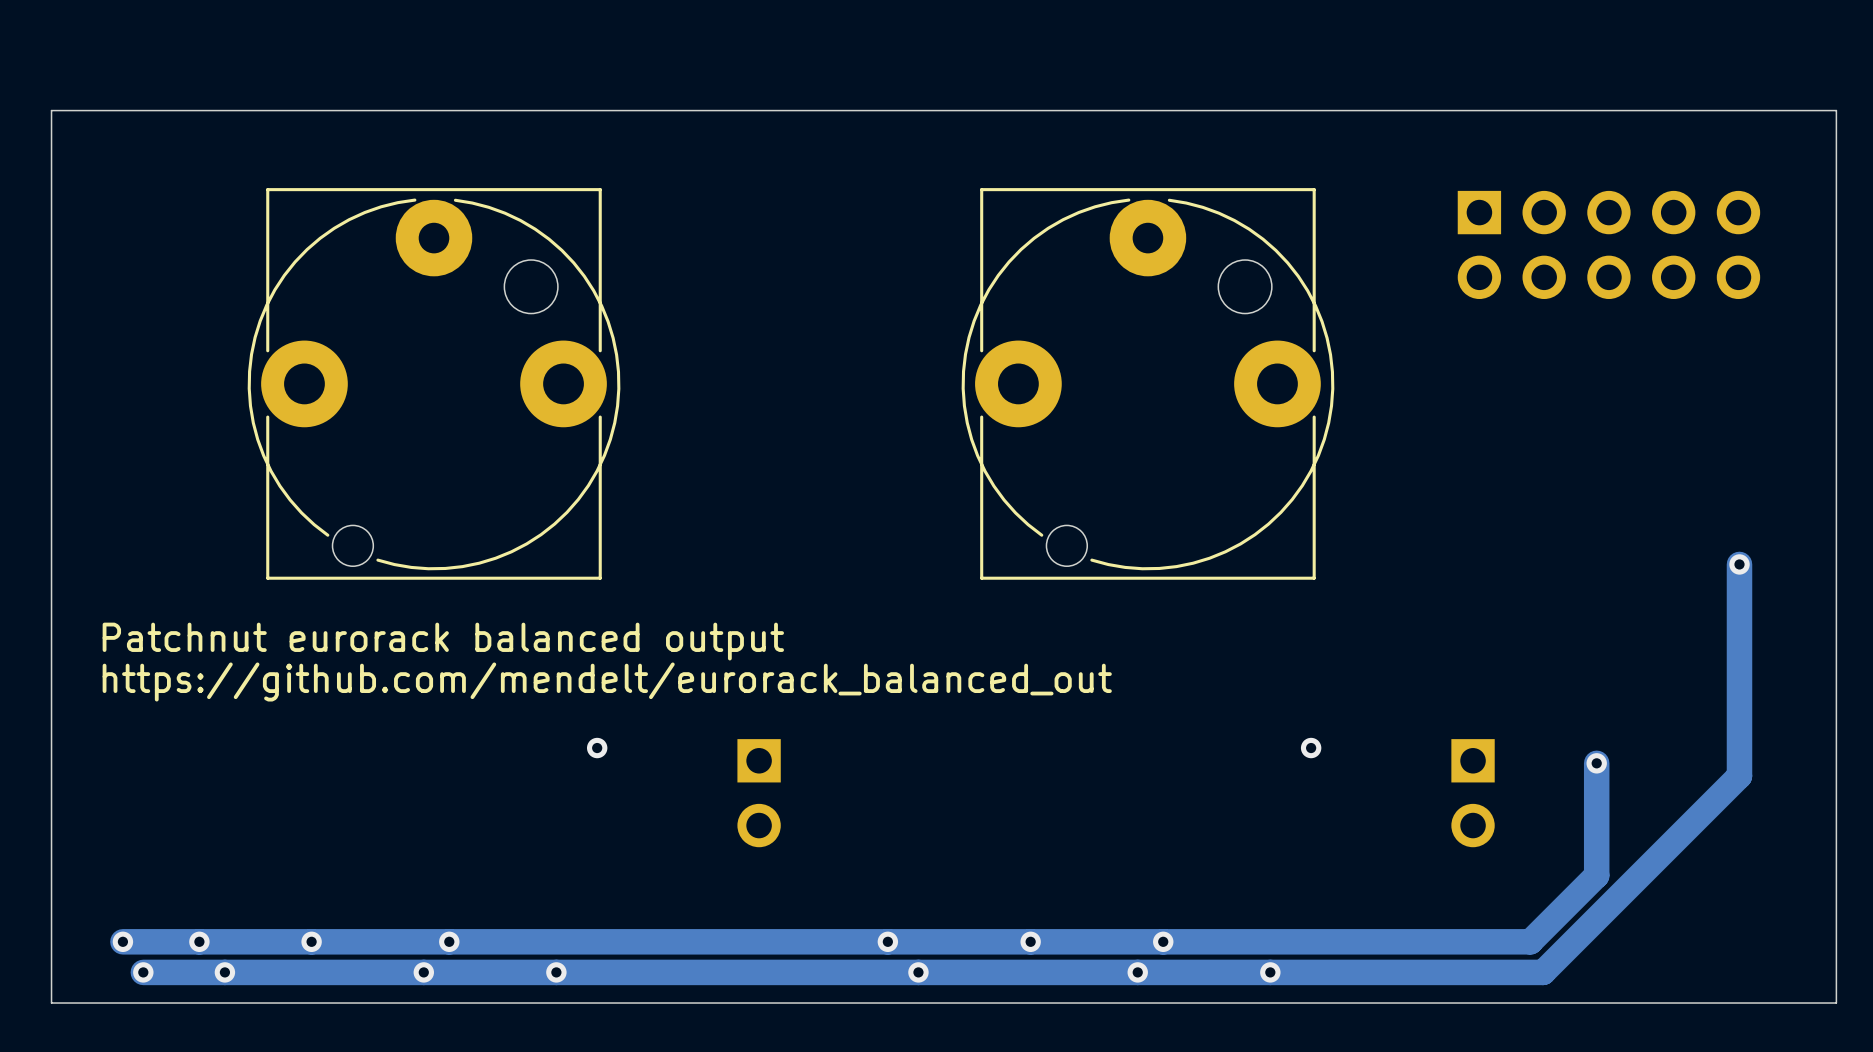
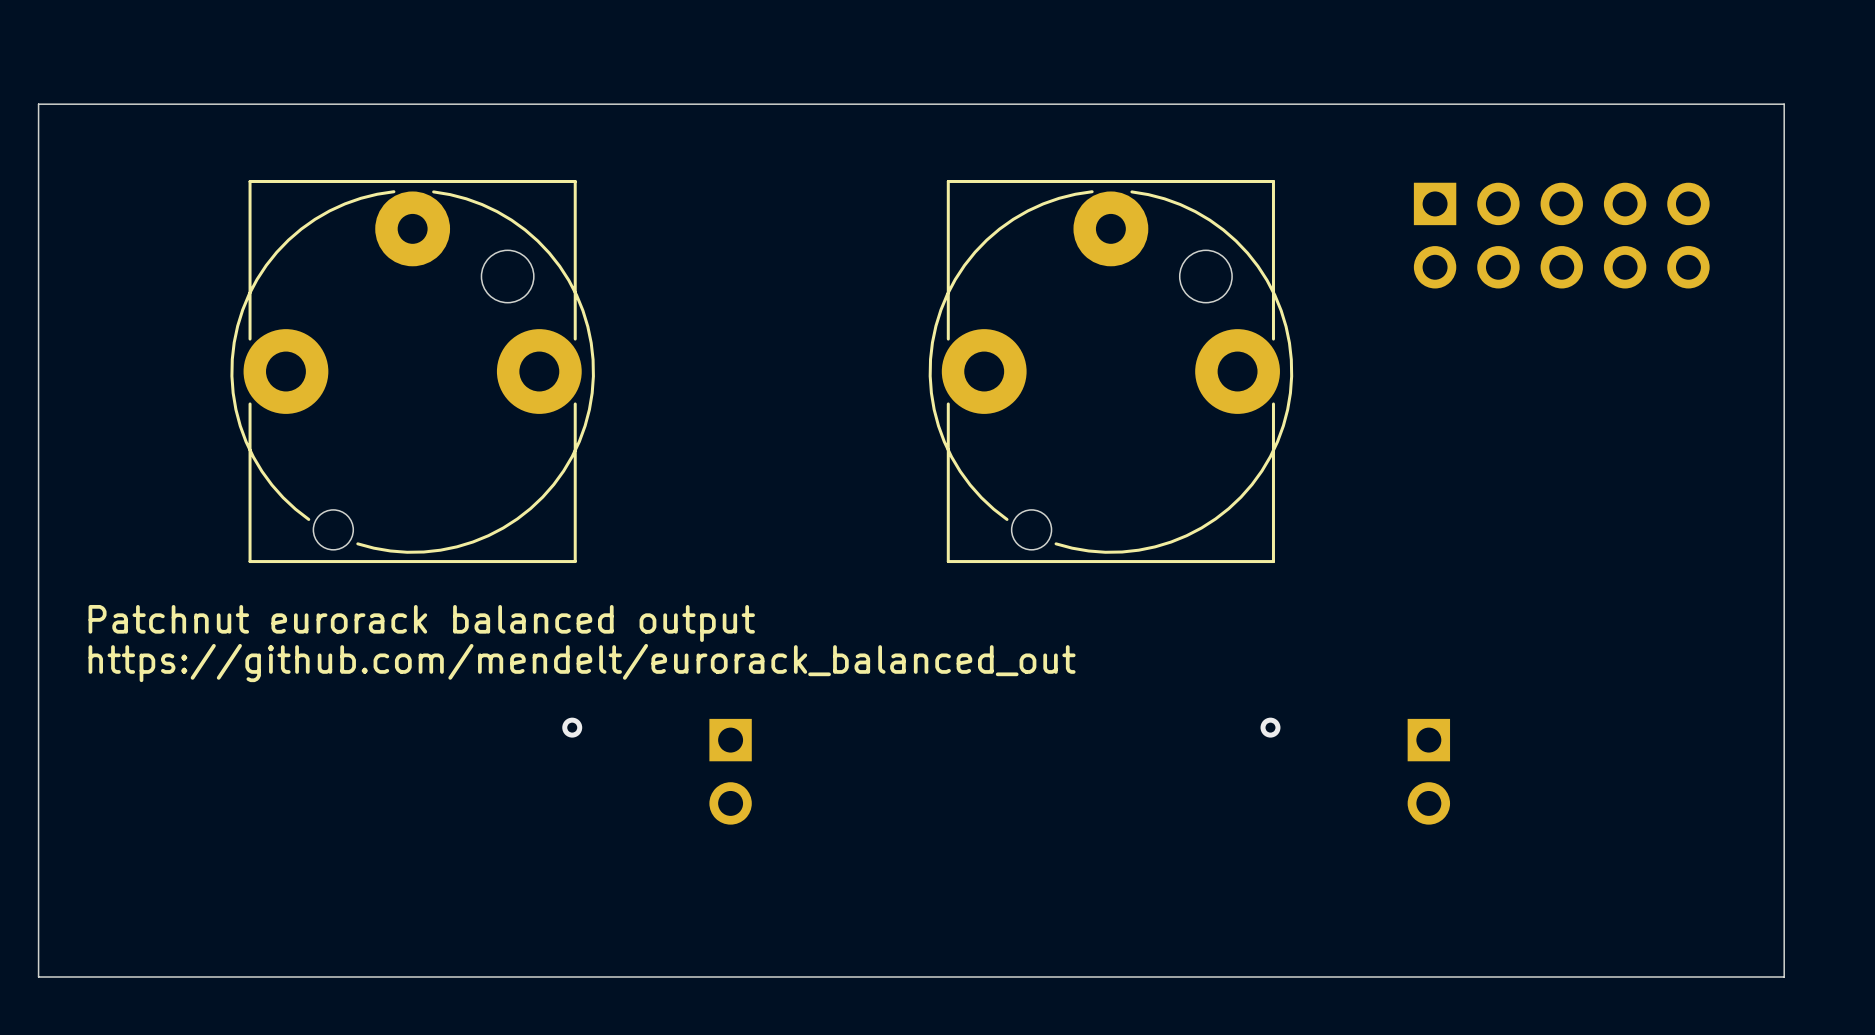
track: (1739, 564) (1739, 776) (1543, 972) (143, 972) -> none
via: (1739, 564) -> none
track: (1596, 763) (1596, 875) (1530, 941) (122, 941) -> none
via: (1596, 763) -> none
via: (122, 941) -> none
via: (199, 941) -> none
via: (311, 941) -> none
via: (449, 941) -> none
via: (887, 941) -> none
via: (1030, 941) -> none
via: (1163, 941) -> none
via: (143, 972) -> none
via: (224, 972) -> none
via: (423, 972) -> none
via: (556, 972) -> none
via: (918, 972) -> none
via: (1137, 972) -> none
via: (1270, 972) -> none

